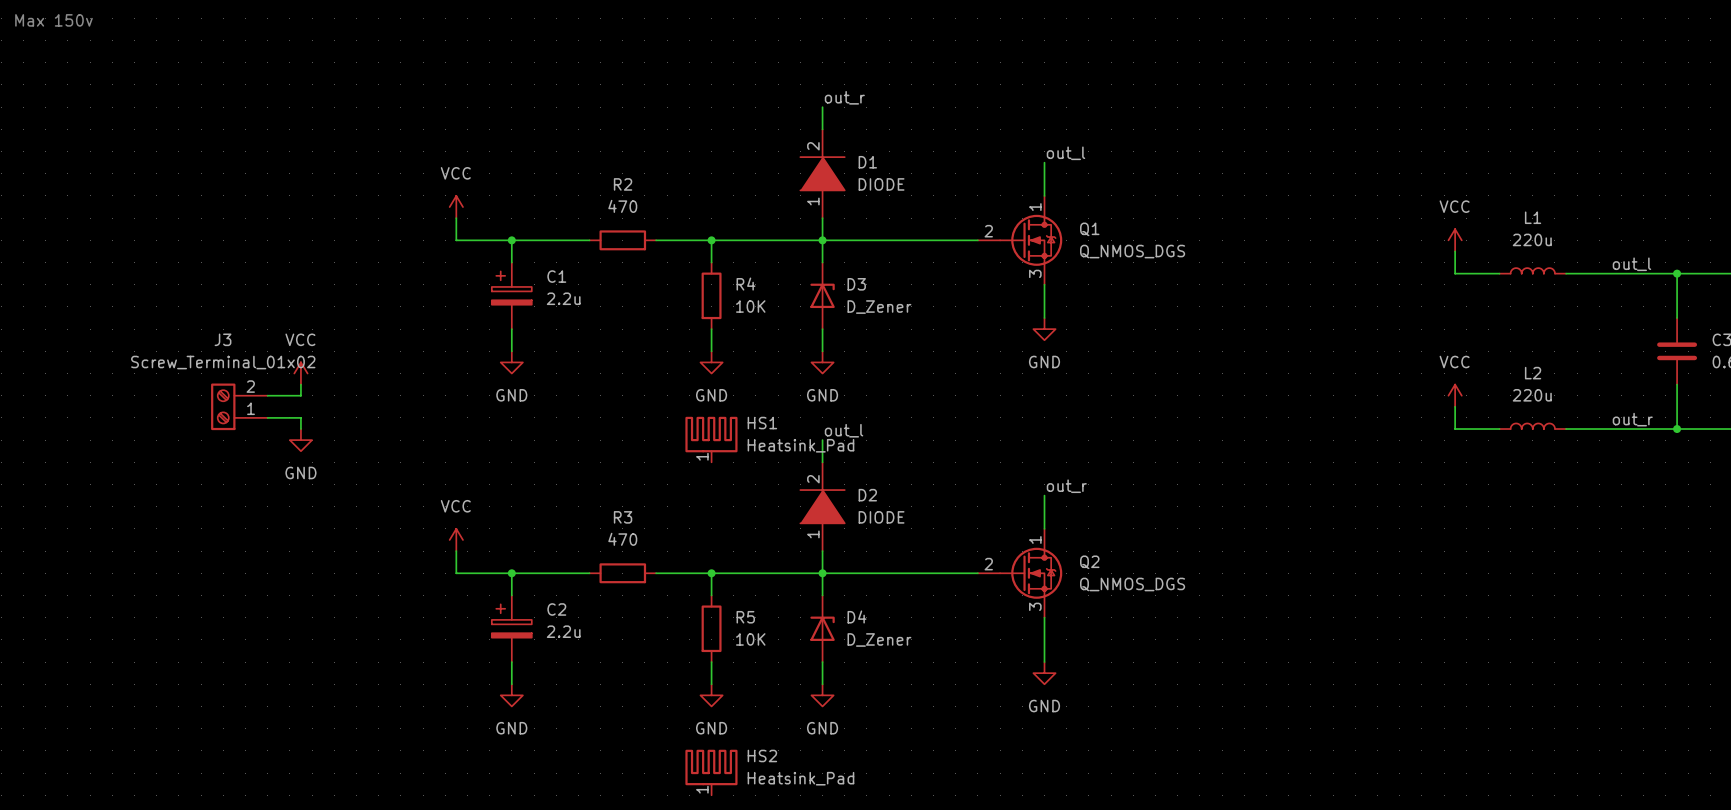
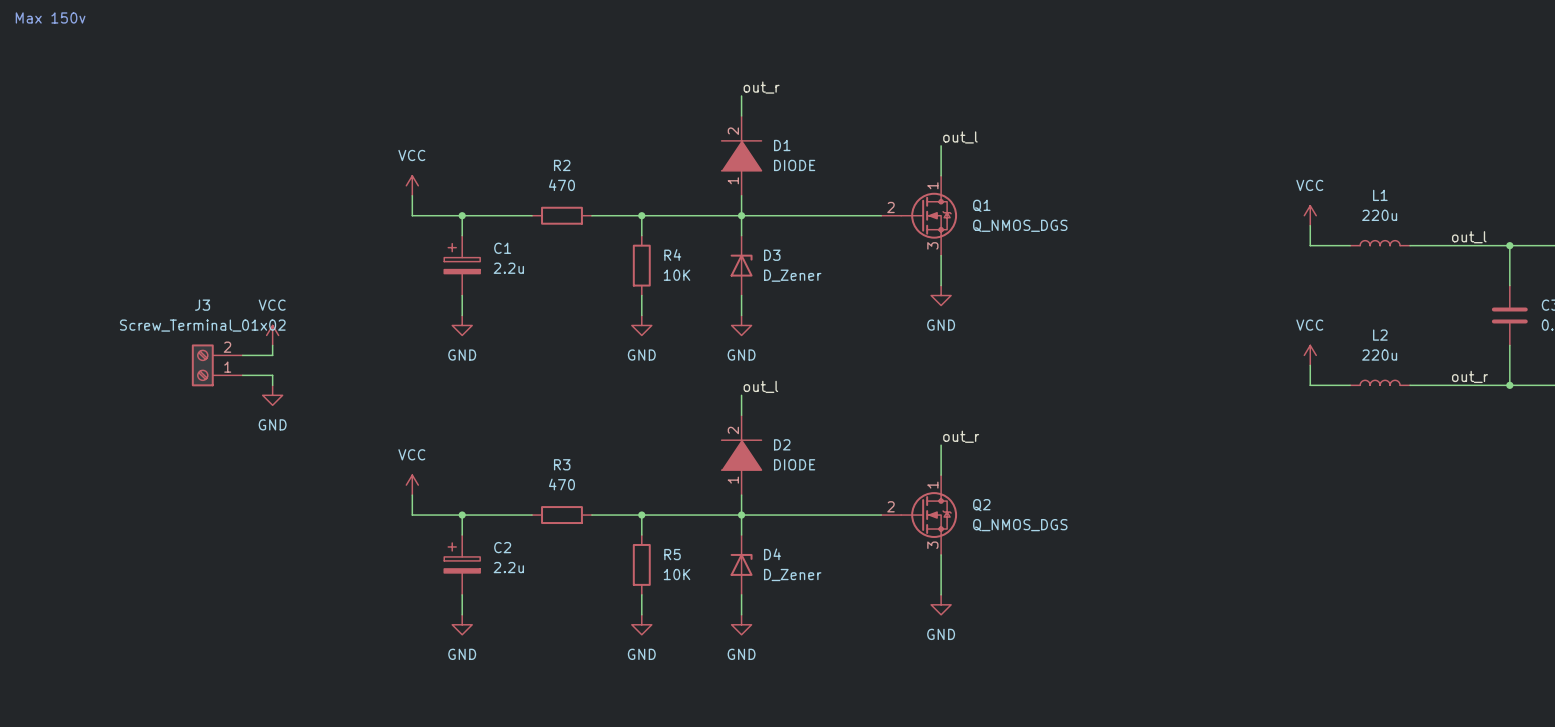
HS1: Heatsink_Pad (711, 439) -> none
HS2: Heatsink_Pad (711, 772) -> none

